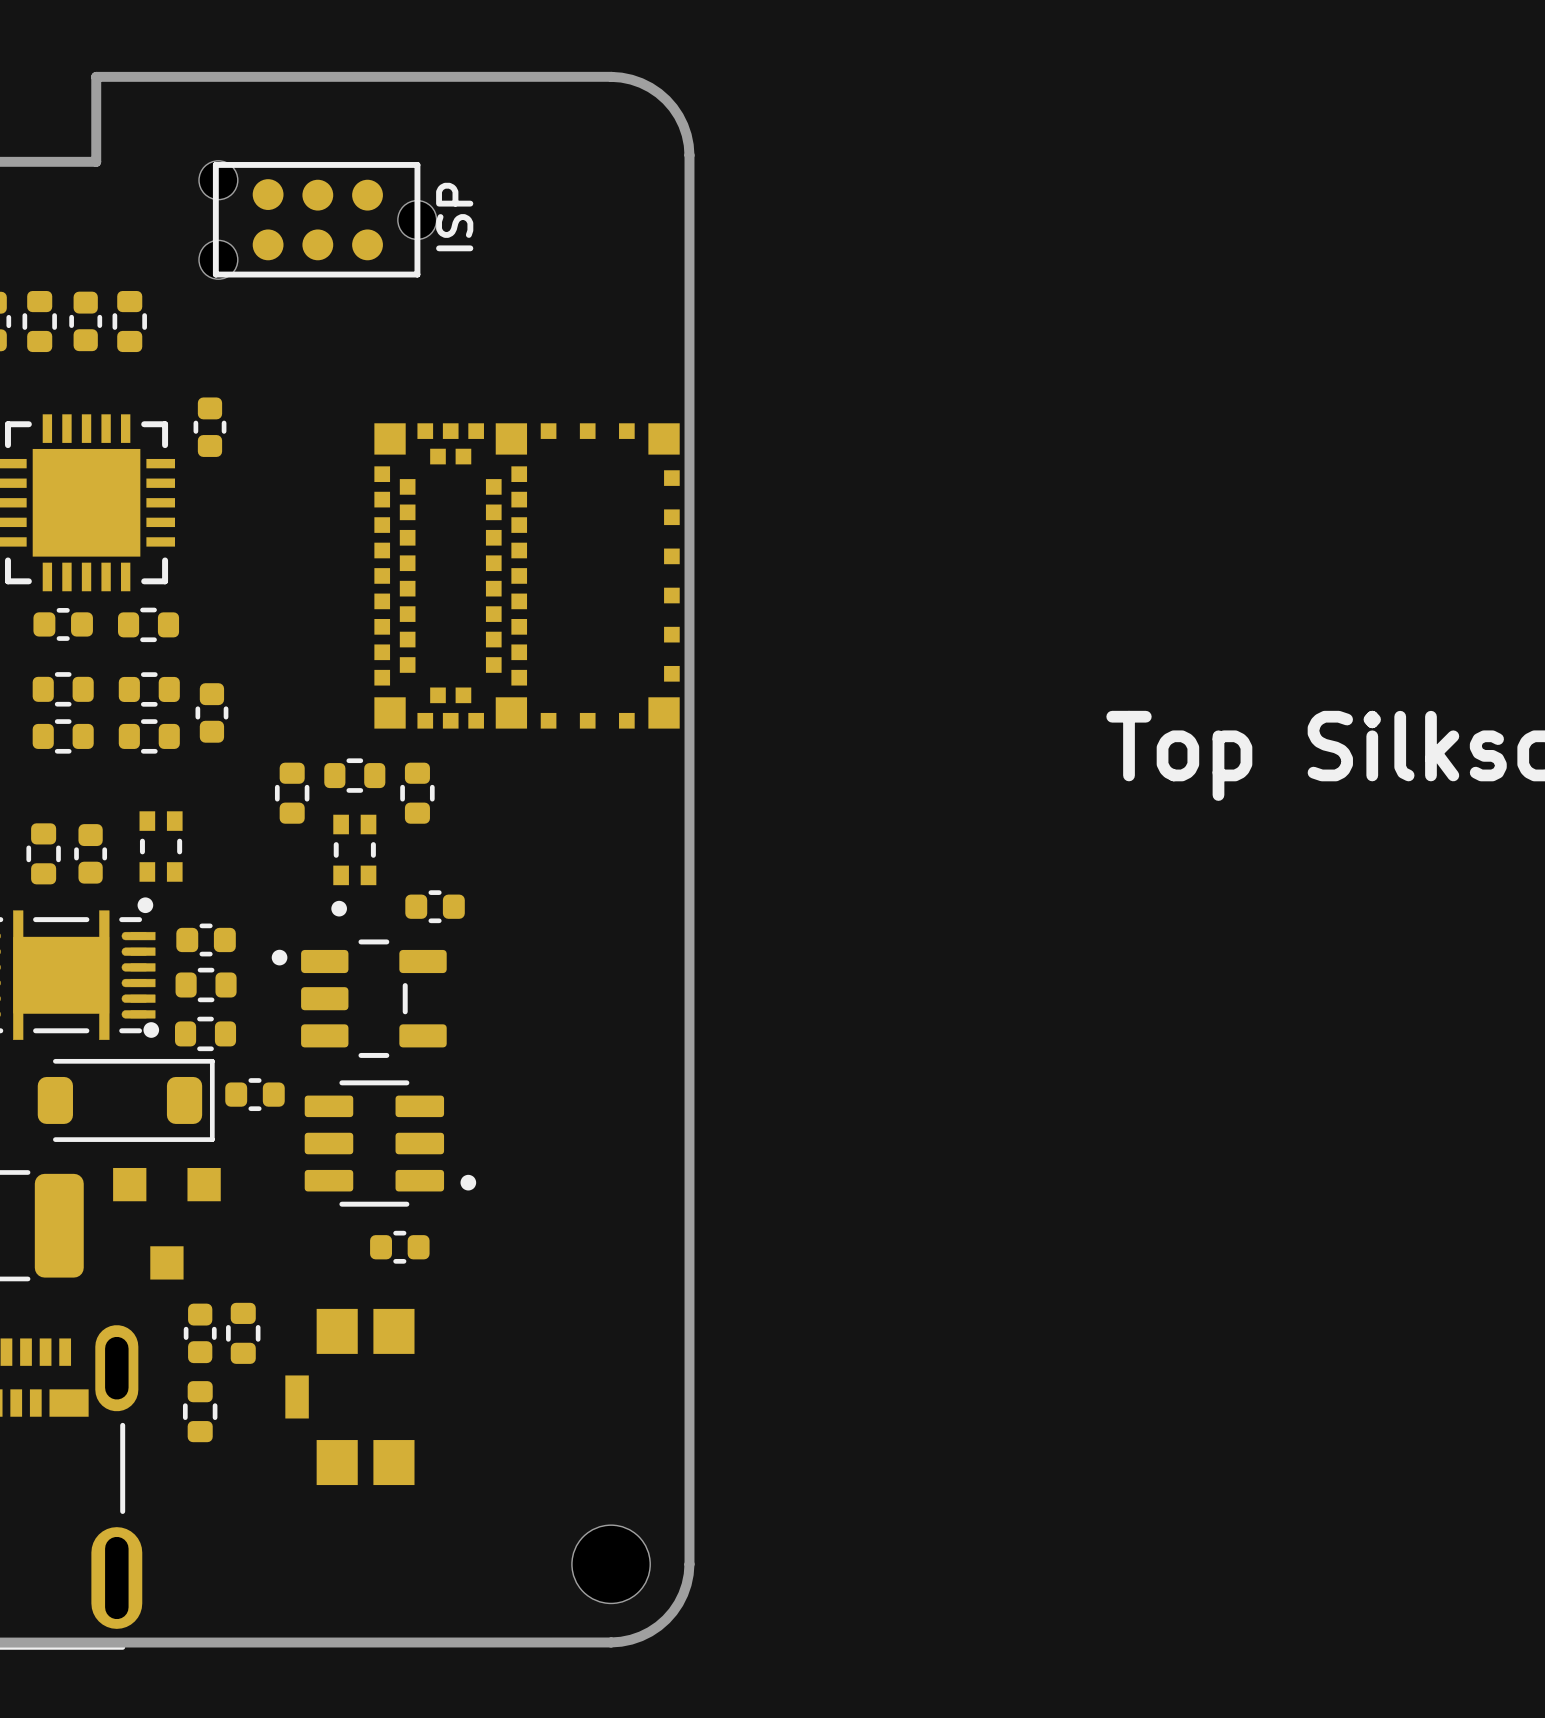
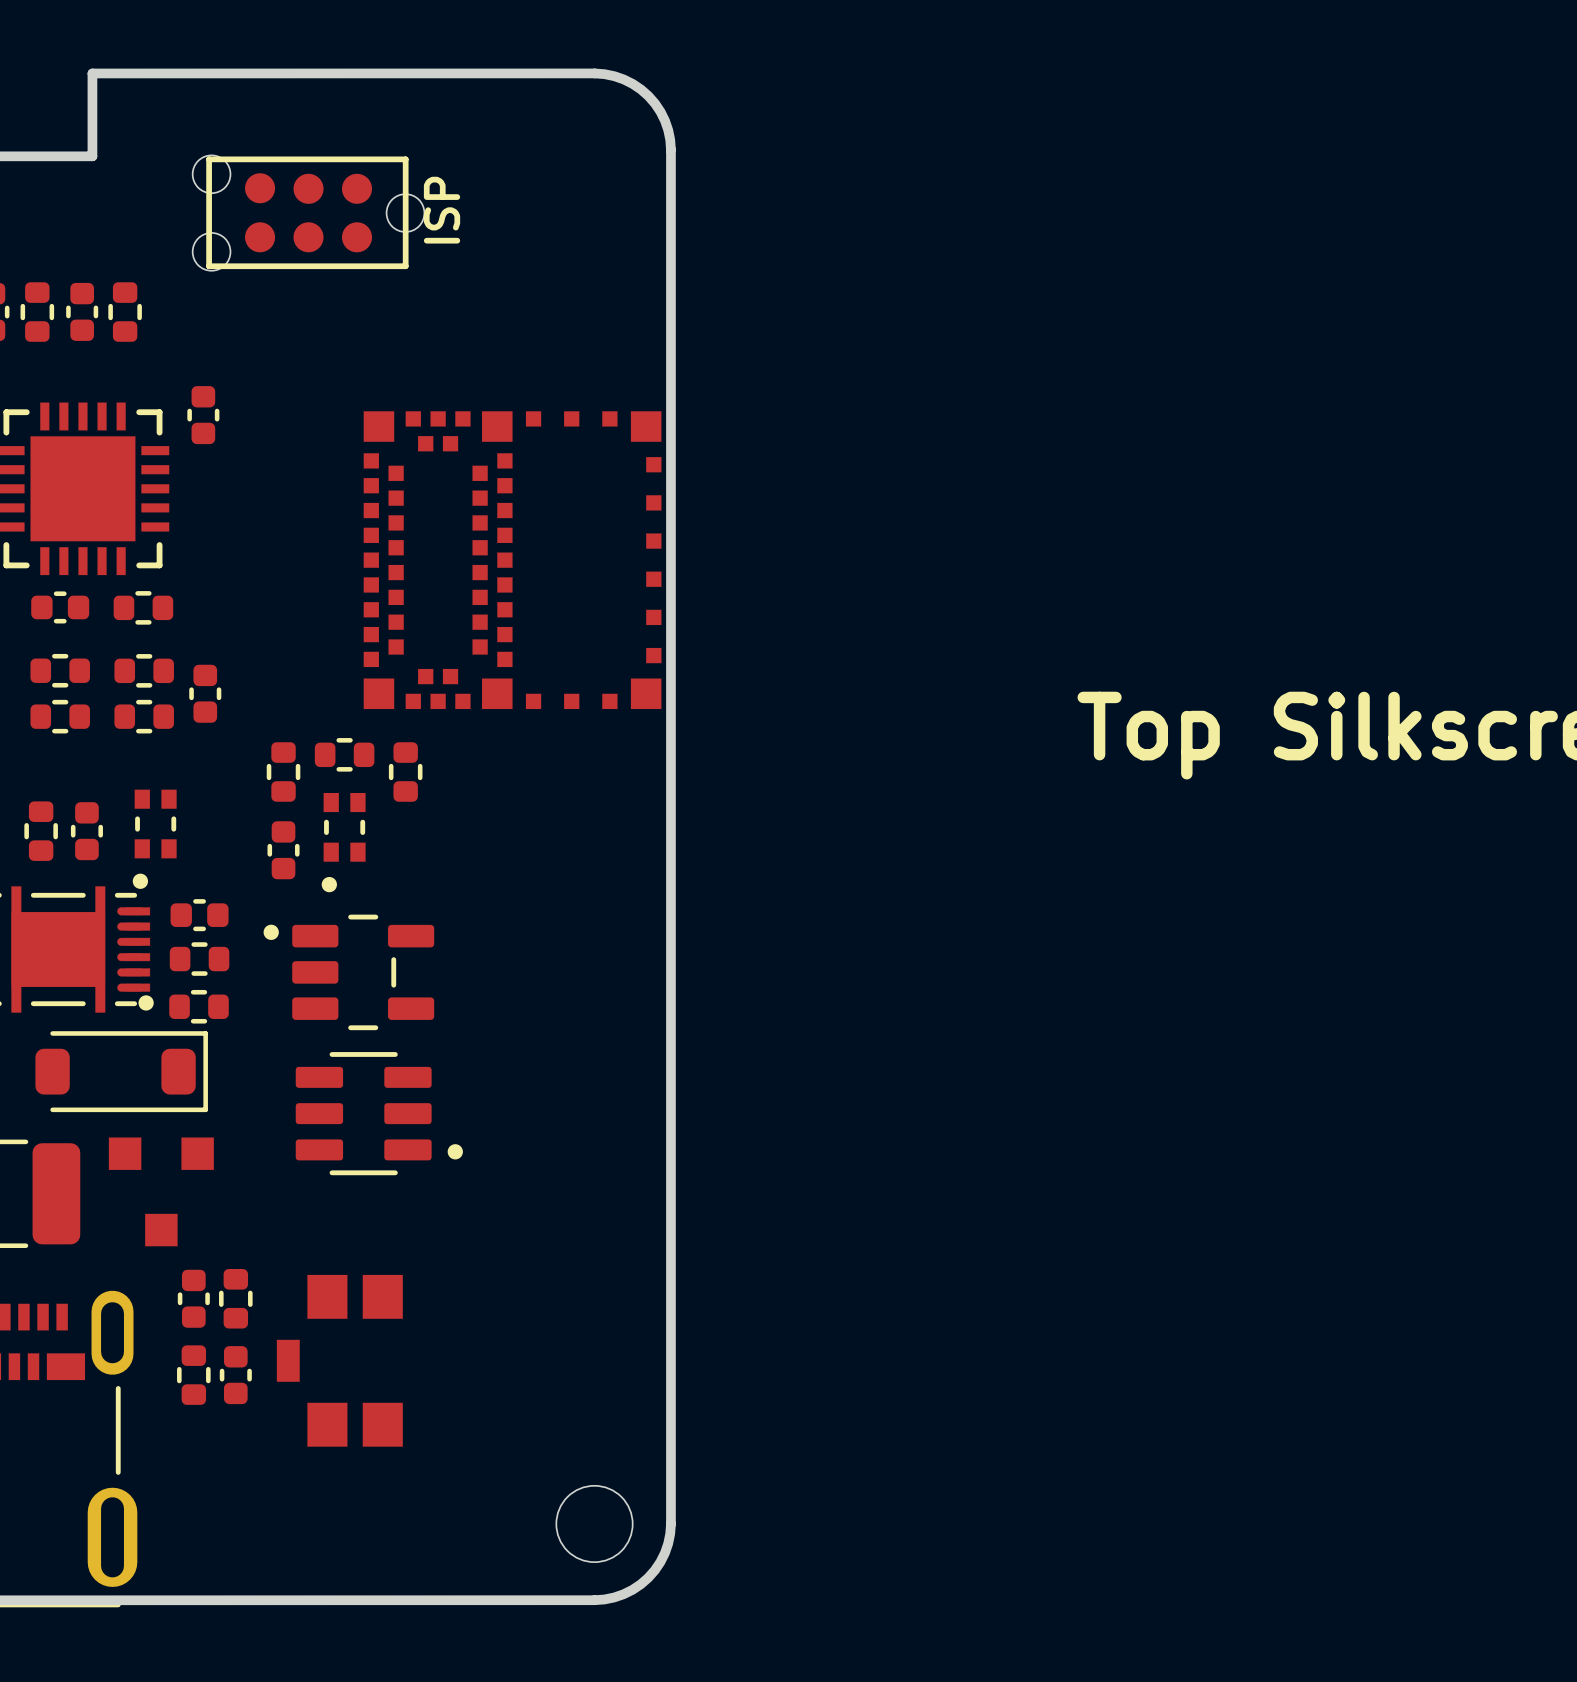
part: none -> (283, 850)
part: (435, 906) -> none
part: (254, 1094) -> none
part: (399, 1247) -> none
part: none -> (235, 1375)

